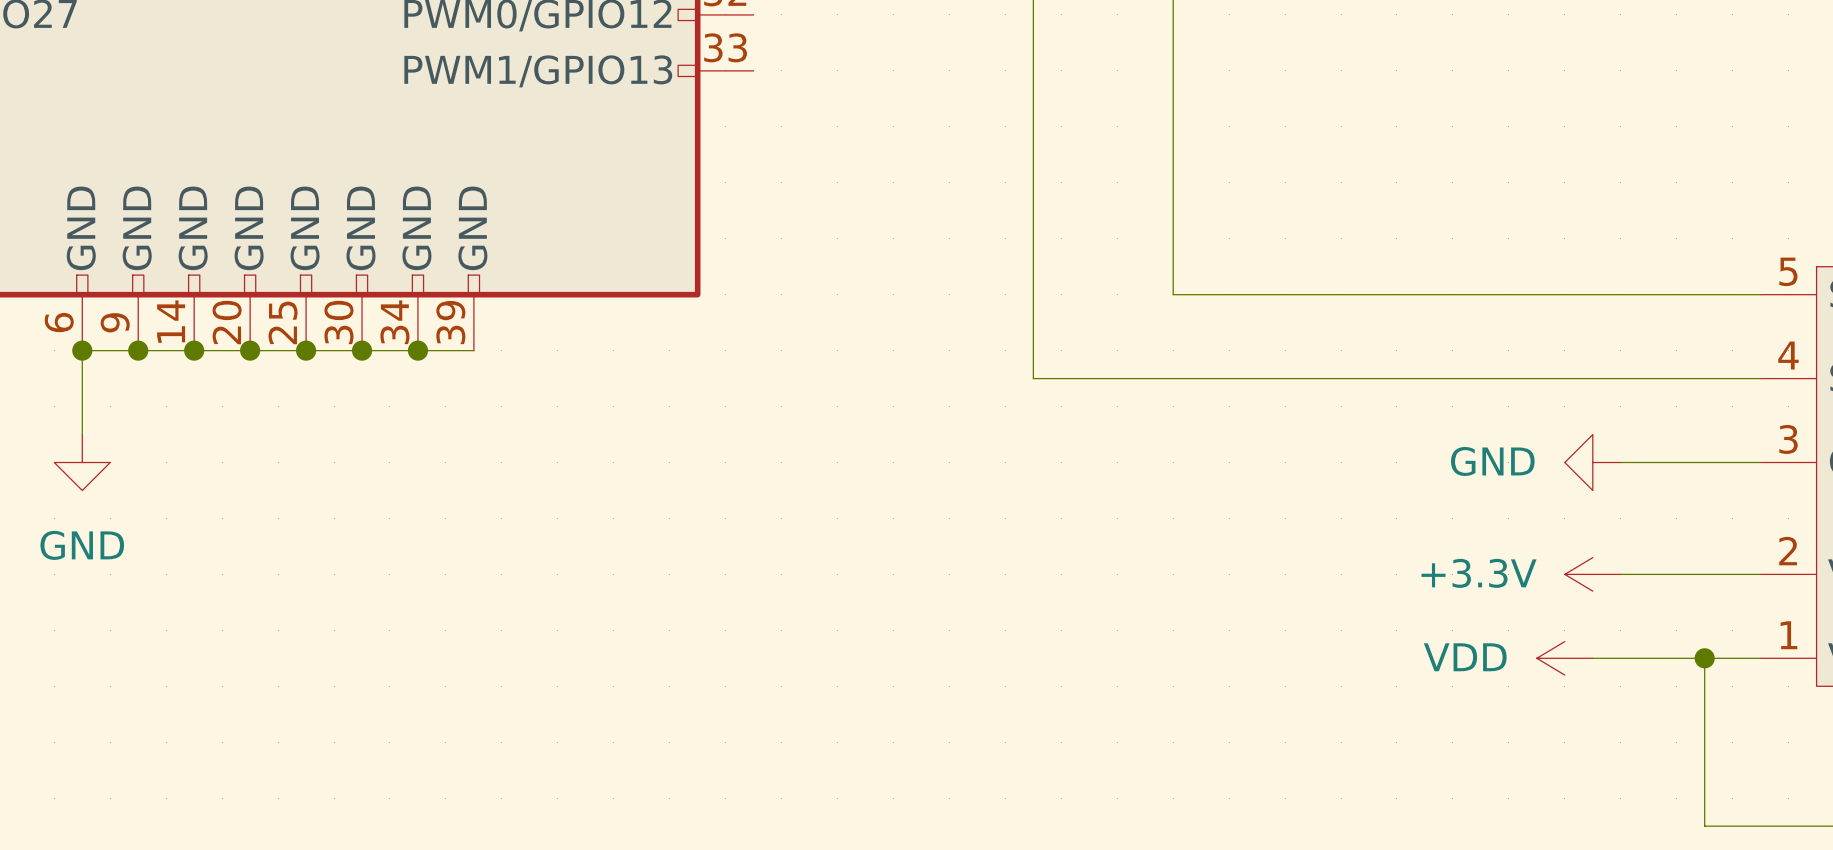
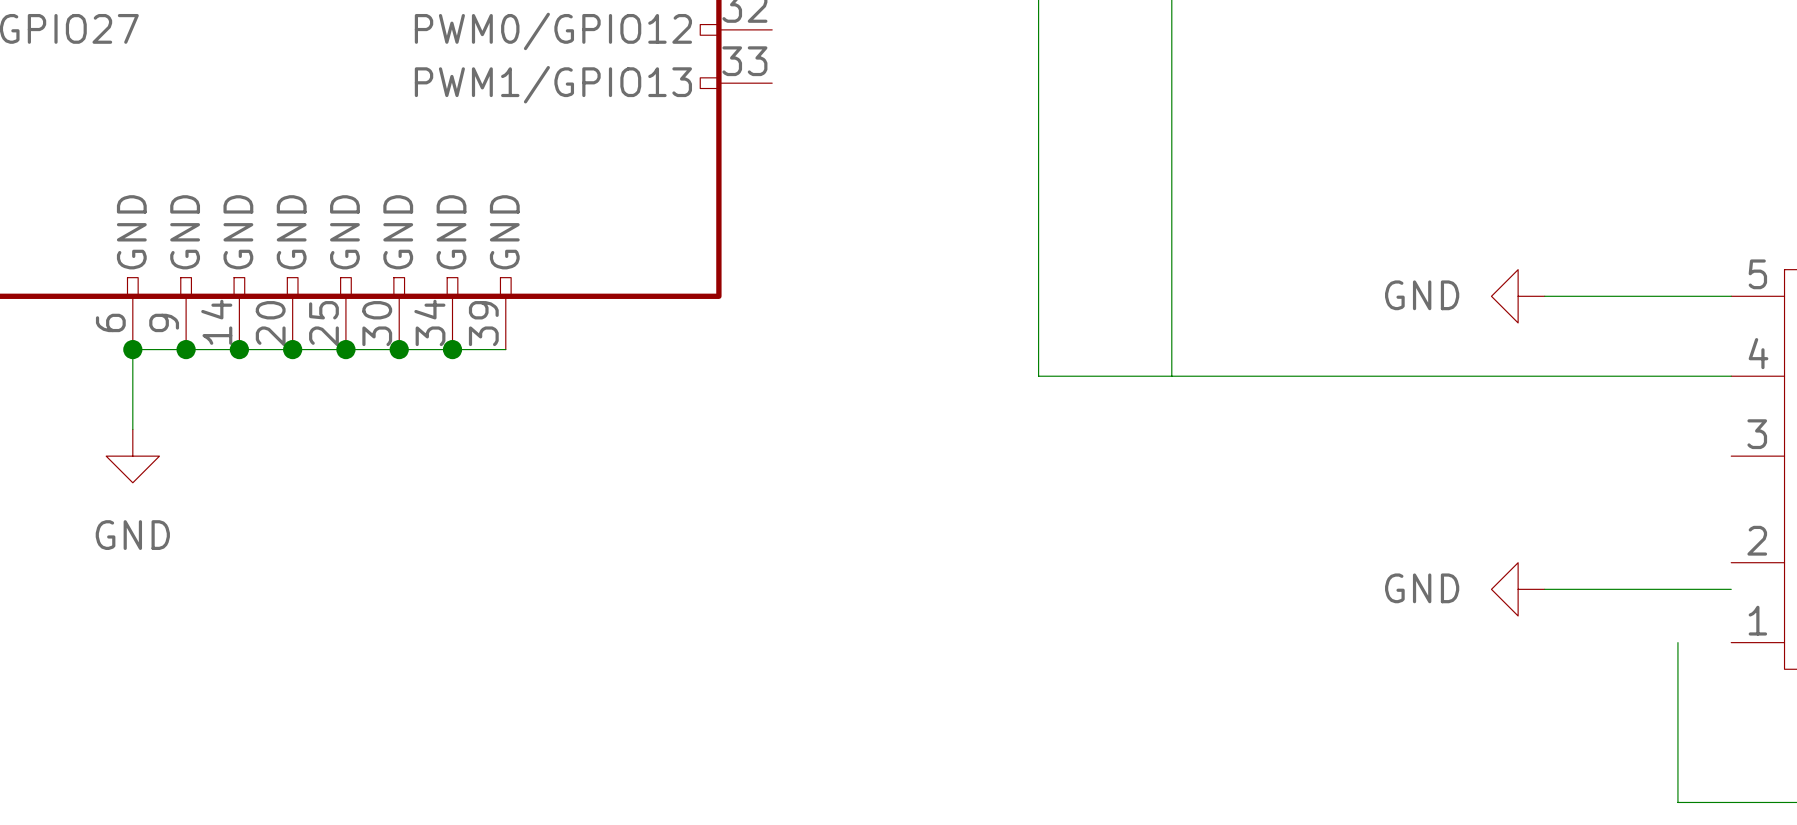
wire: (1173, 294) (1564, 294) -> (1171, 296) (1171, 376)
power symbol: none -> GND (1518, 296)
power symbol: GND (1592, 462) -> none
wire: (1620, 462) (1760, 462) -> none
power symbol: +3.3V (1592, 574) -> none
wire: (1620, 574) (1760, 574) -> none
power symbol: none -> GND (1518, 589)
wire: none -> (1544, 589) (1731, 589)
power symbol: VDD (1564, 658) -> none
wire: (1592, 658) (1760, 658) -> none
junction: (1704, 658) -> none

